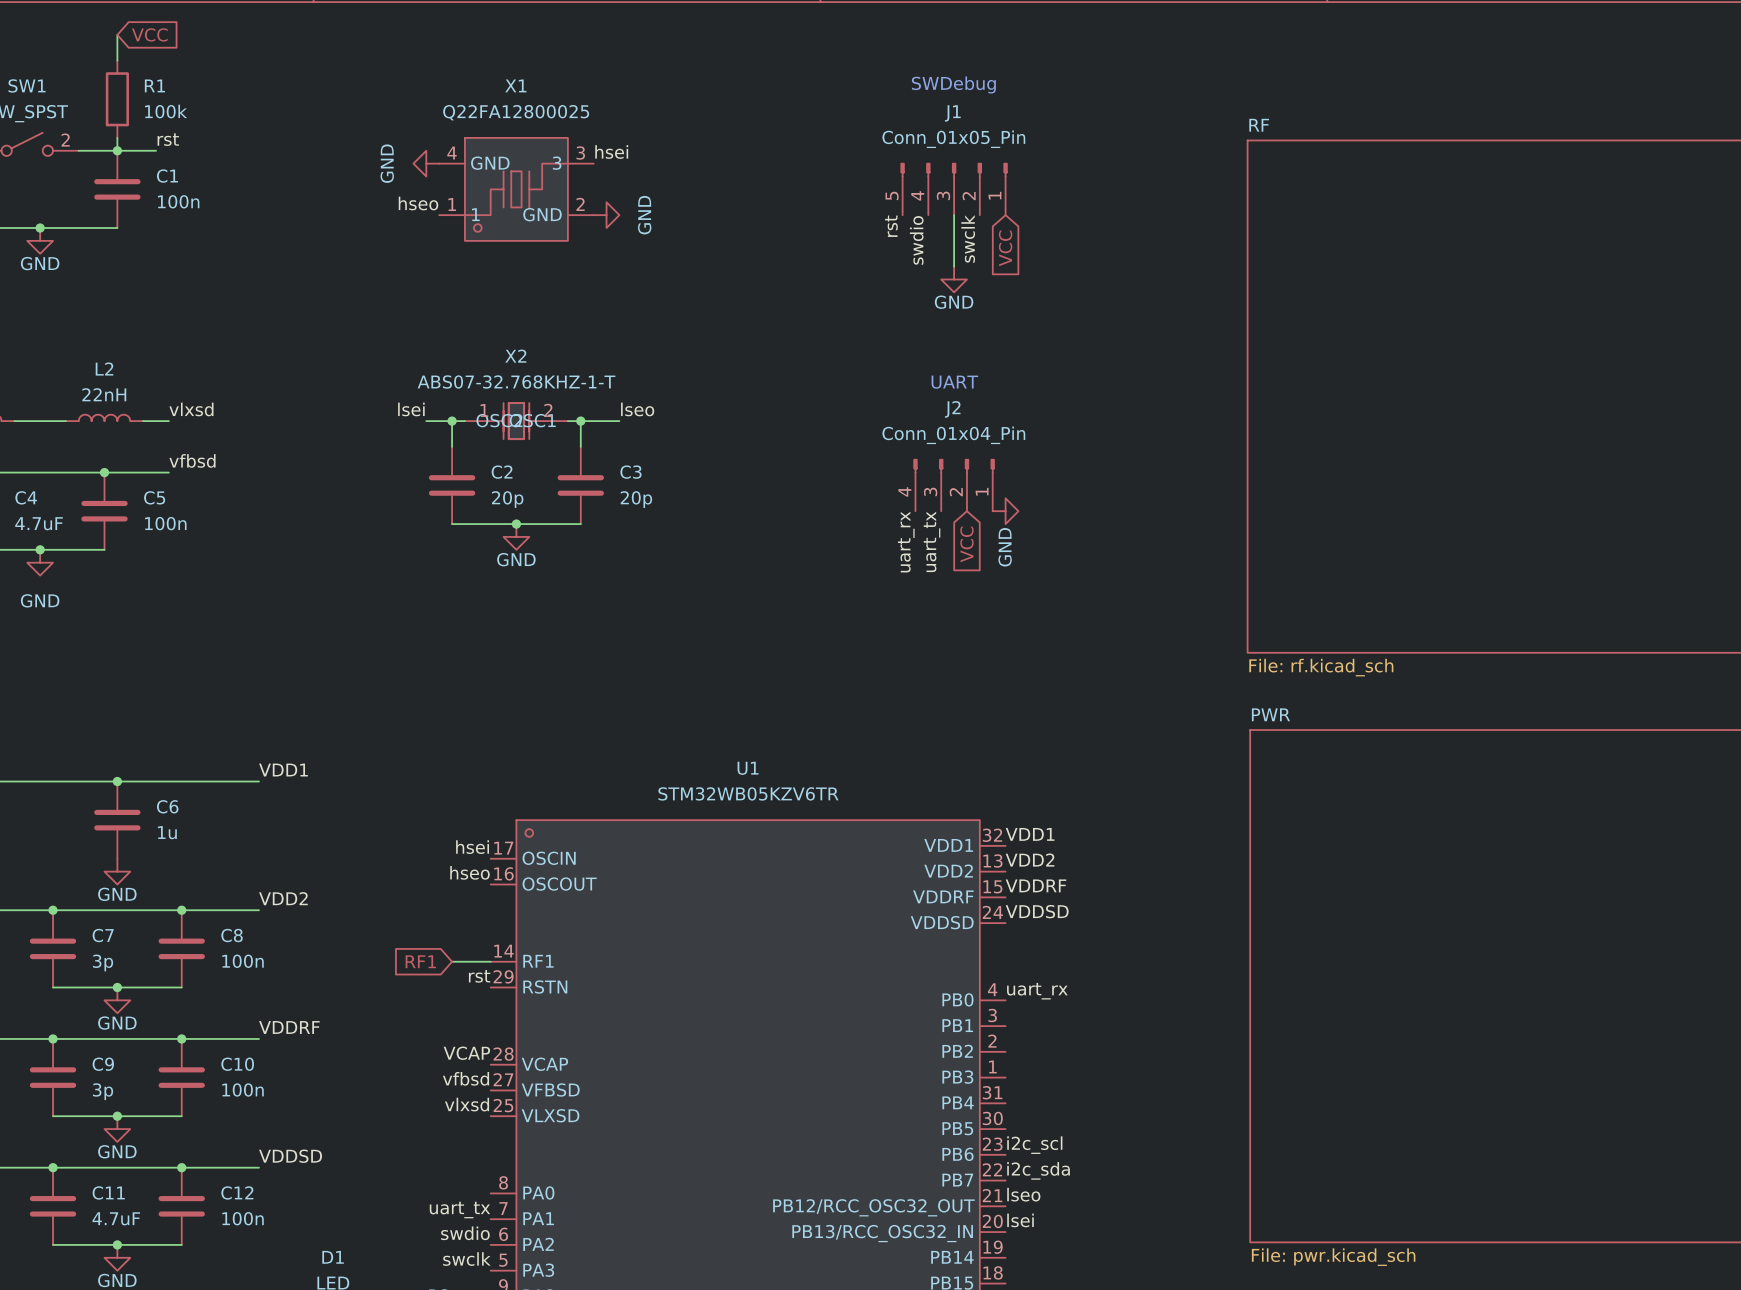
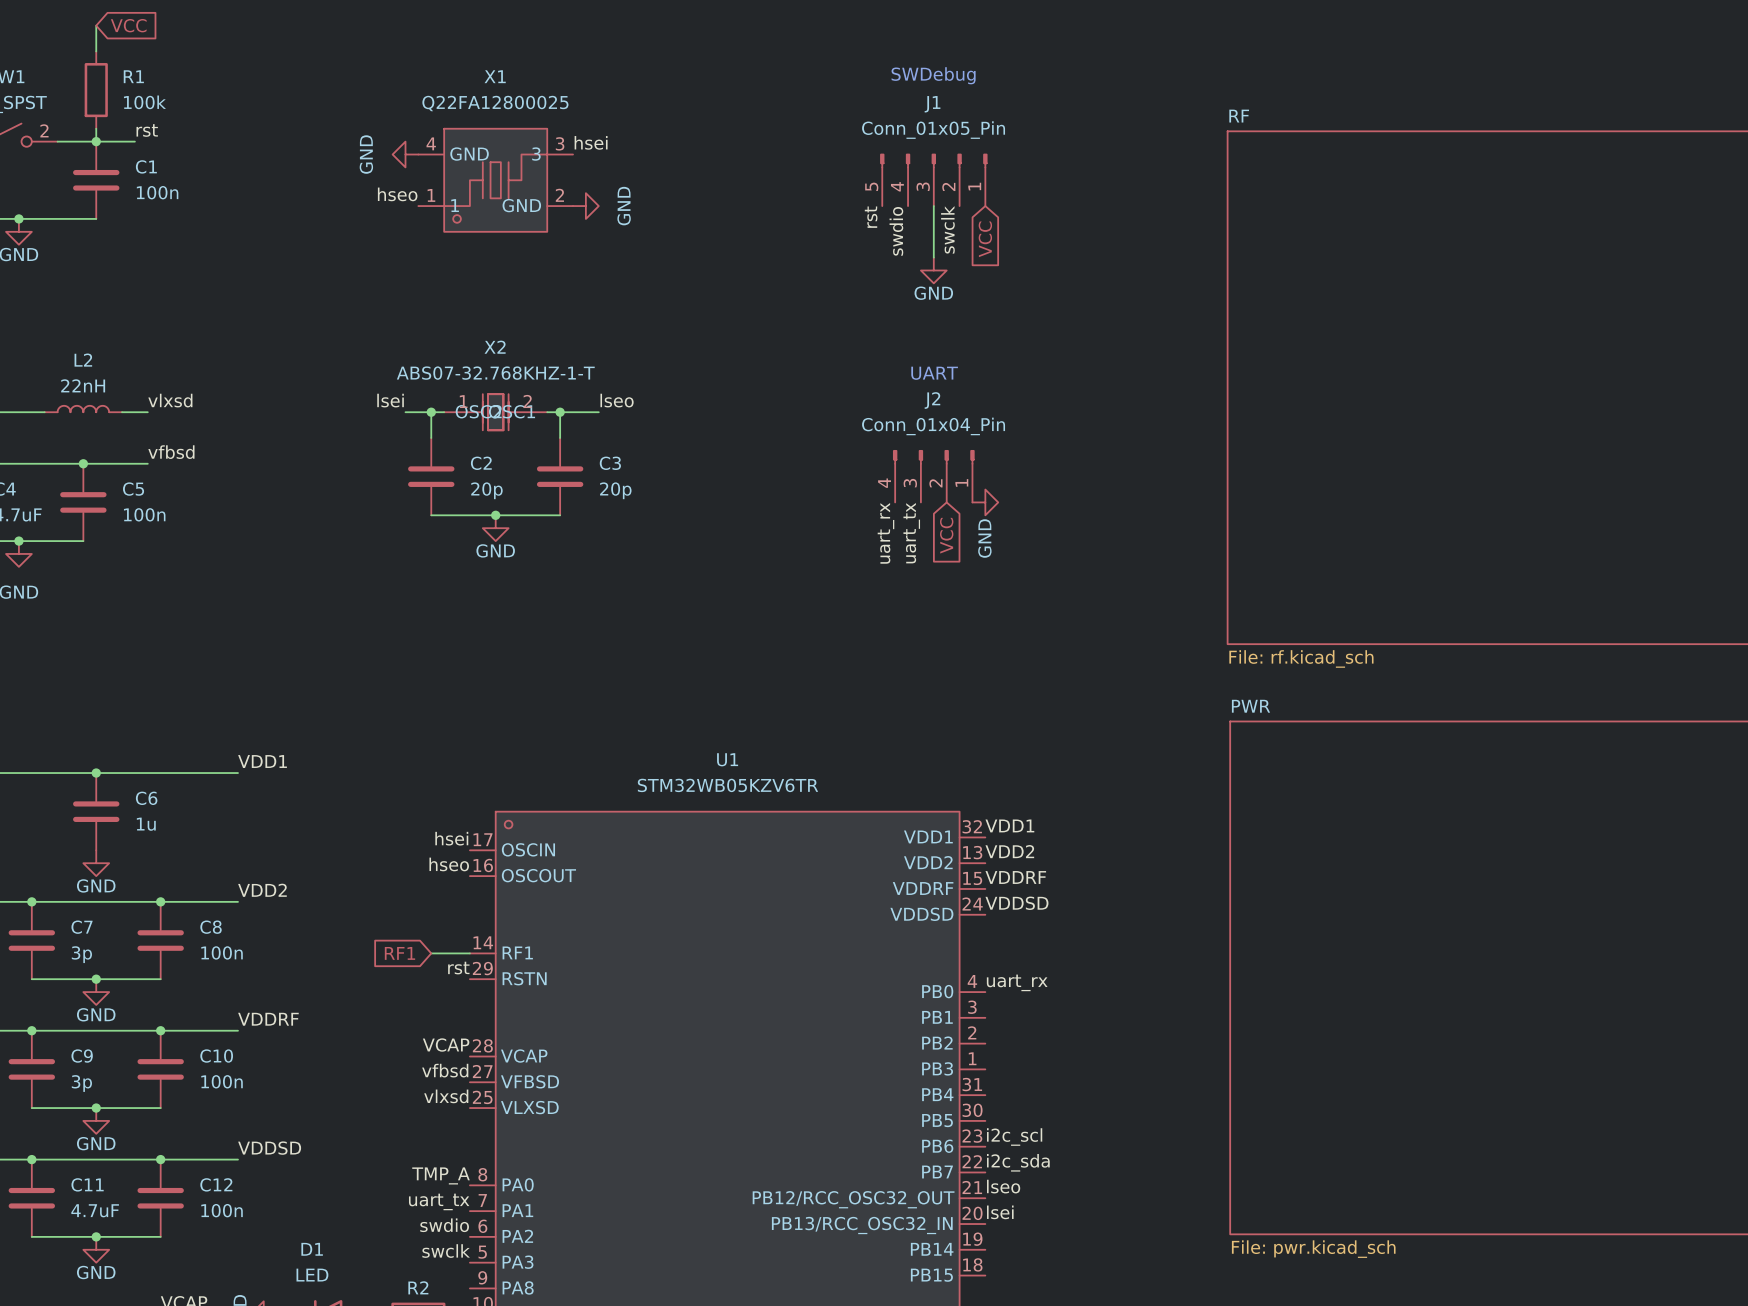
label: none -> TMP_A (441, 1175)

